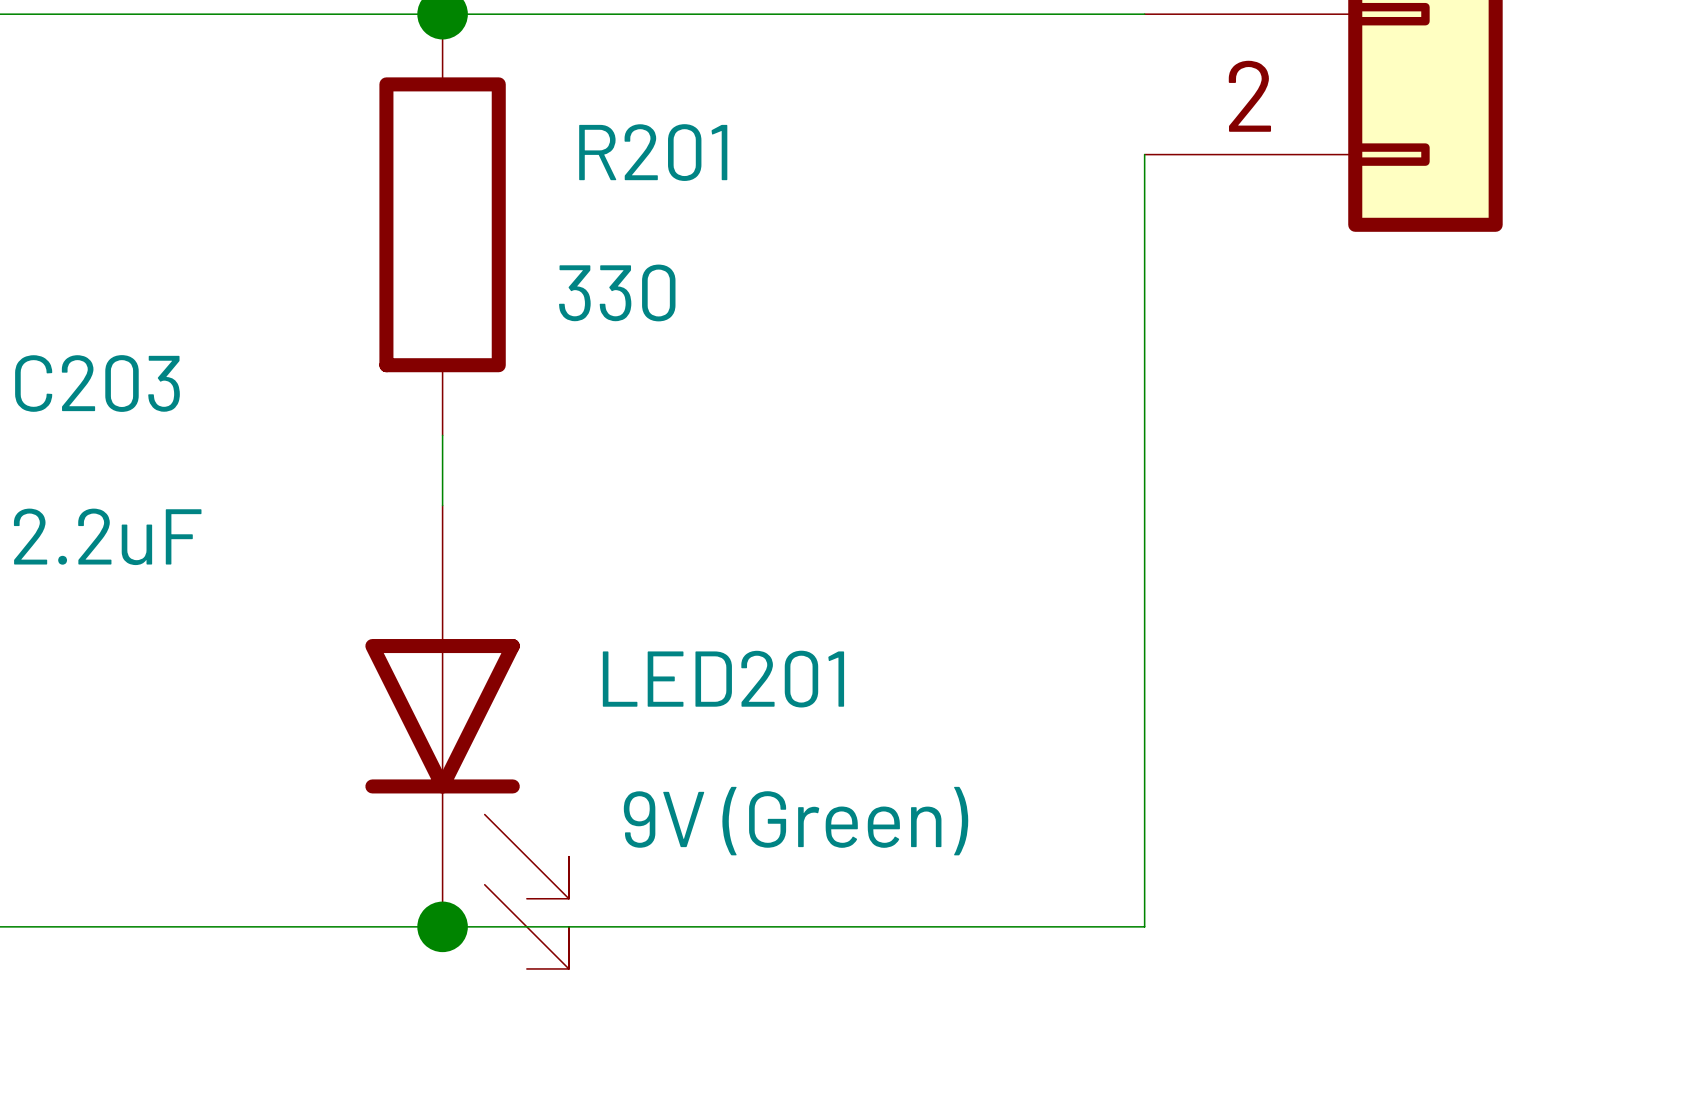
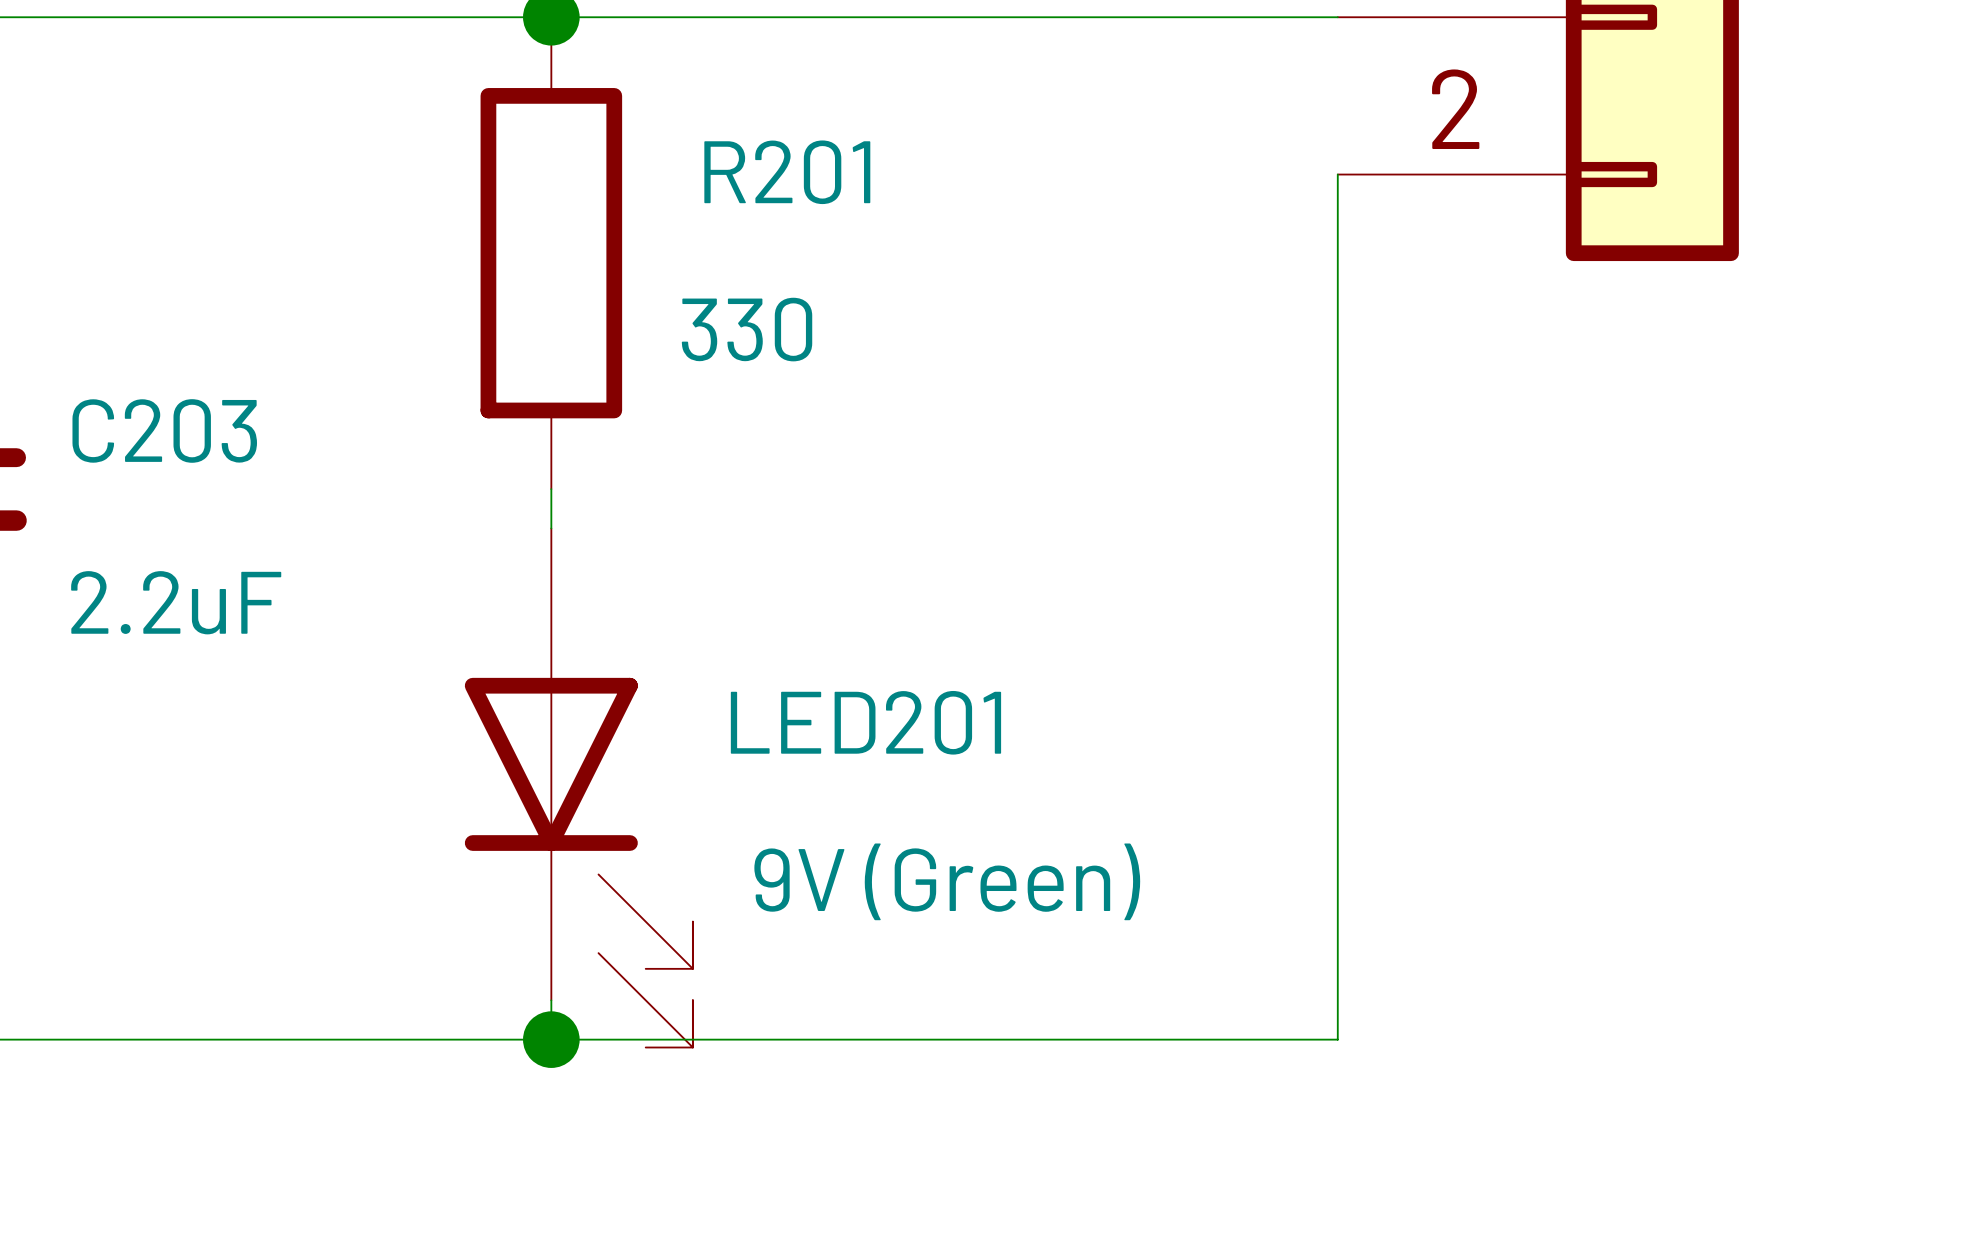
LED201 position: (467, 737) -> (578, 787)

